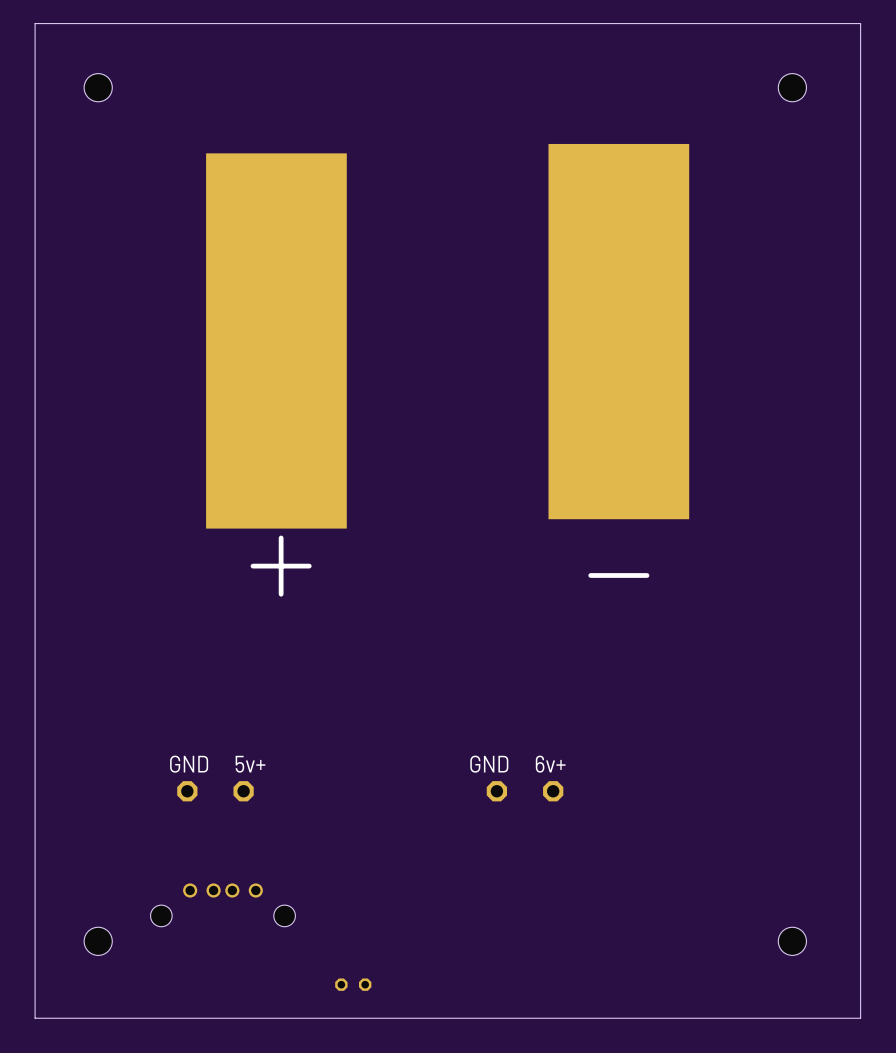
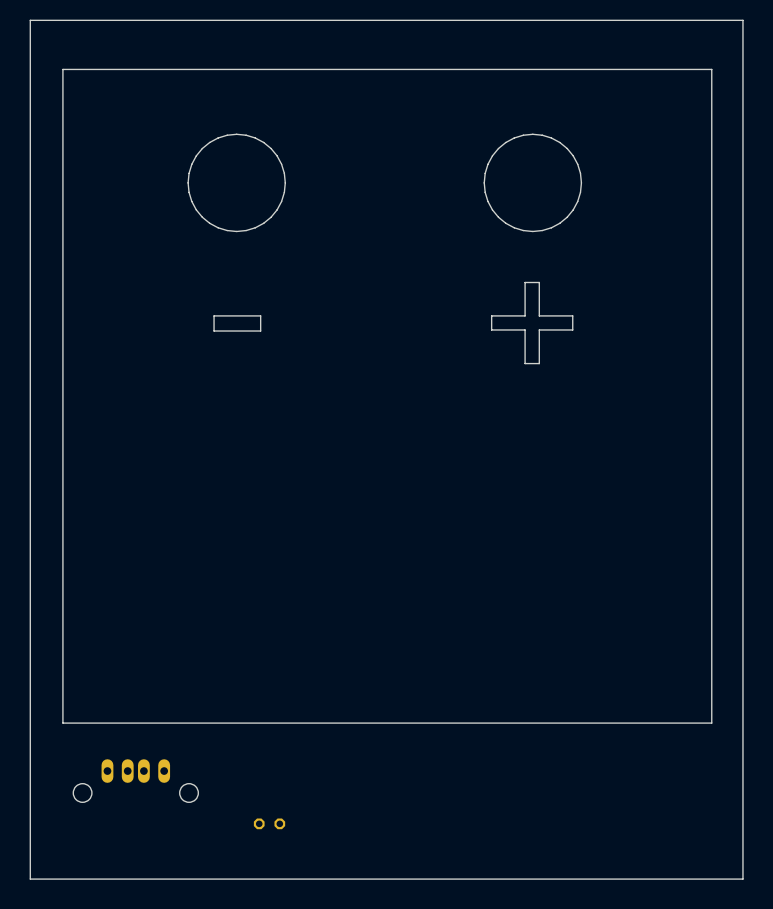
board edge: none -> (711, 69) (62, 69) (62, 723) (711, 723) (711, 69)
part: (98, 87) -> none
part: (792, 87) -> none
board edge: none -> (236, 134) (255, 138) (271, 148) (281, 164) (285, 182) (281, 201) (271, 217) (255, 227) (236, 231) (218, 227) (202, 217) (191, 201) (188, 182) (191, 164) (202, 148) (218, 138) (236, 134)
board edge: none -> (532, 134) (551, 138) (567, 148) (577, 164) (581, 182) (577, 201) (567, 217) (551, 227) (532, 231) (514, 227) (498, 217) (487, 201) (484, 182) (487, 164) (498, 148) (514, 138) (532, 134)
board edge: none -> (539, 282) (539, 315) (572, 315) (572, 329) (539, 329) (539, 363) (525, 363) (525, 329) (491, 329) (491, 315) (525, 315) (525, 282) (539, 282)
part: (618, 331) -> none
part: (276, 340) -> none
board edge: none -> (260, 315) (214, 315) (214, 331) (260, 331) (260, 315)
line: (281, 537) (281, 594) -> none
line: (309, 566) (252, 566) -> none
line: (646, 575) (590, 575) -> none
text: GND (189, 764) -> none
text: 5v+ (250, 764) -> none
text: GND (489, 764) -> none
text: 6v+ (550, 764) -> none
part: (187, 791) -> none
part: (243, 791) -> none
part: (496, 791) -> none
part: (553, 791) -> none
part: none -> (135, 780)
part: (222, 905) -> none
part: (98, 941) -> none
part: (792, 941) -> none
part position: (353, 984) -> (269, 823)

